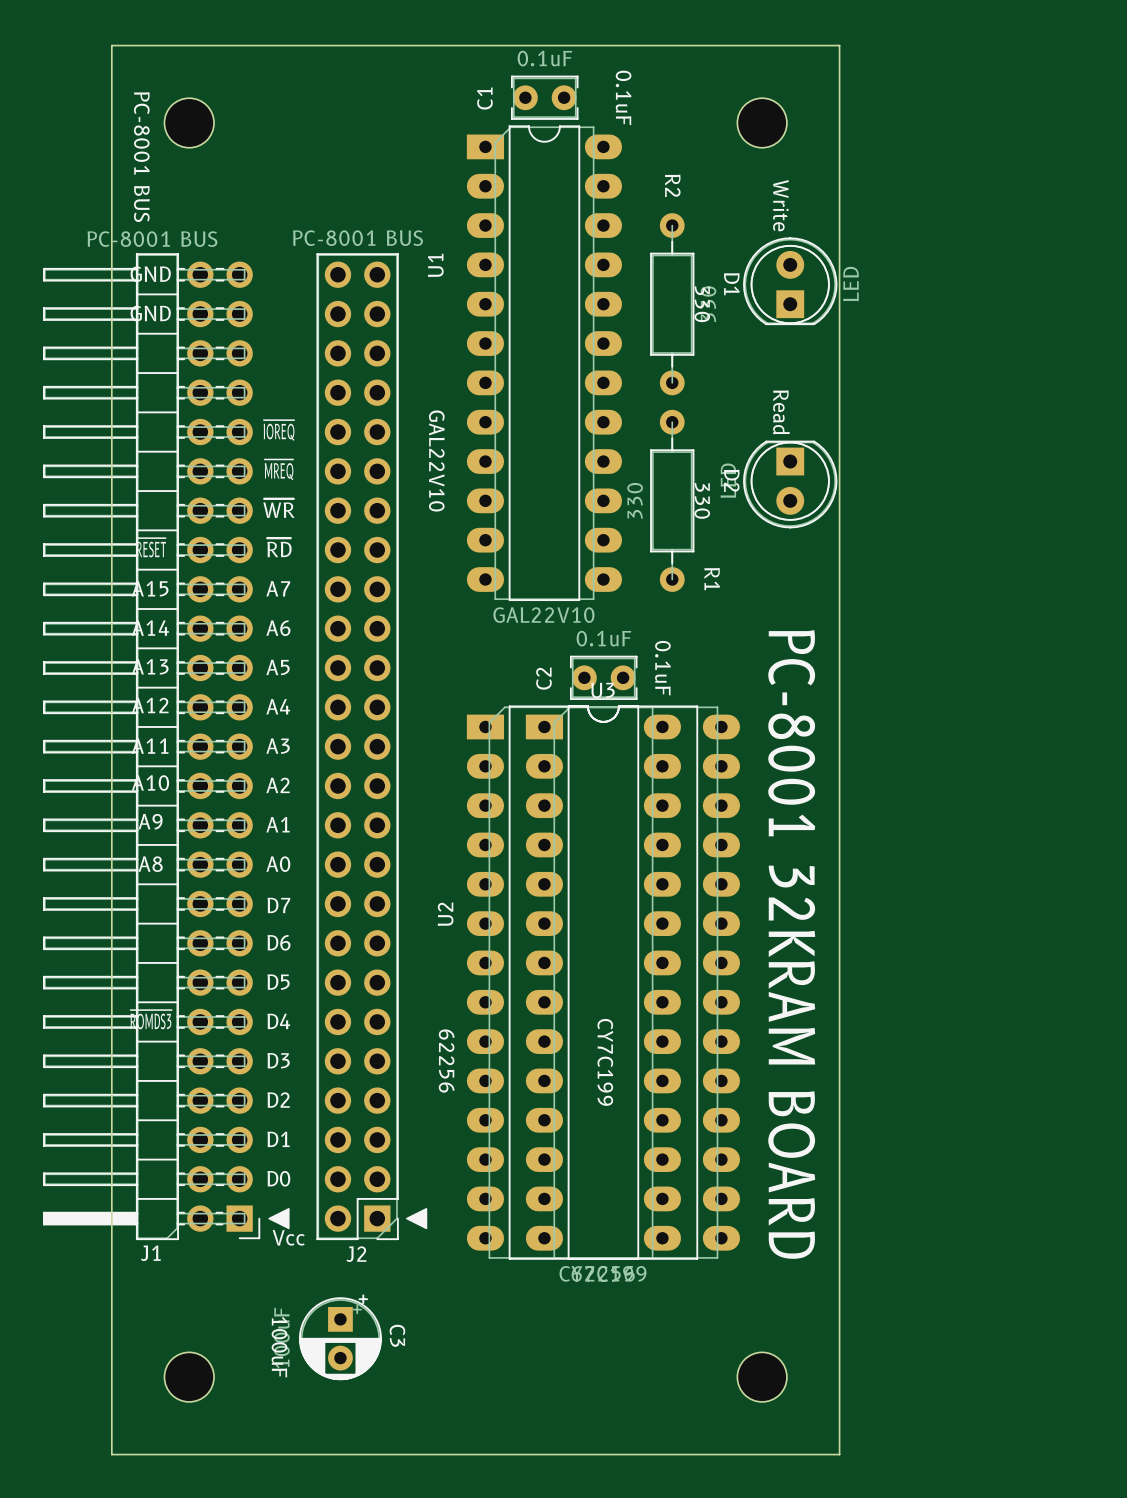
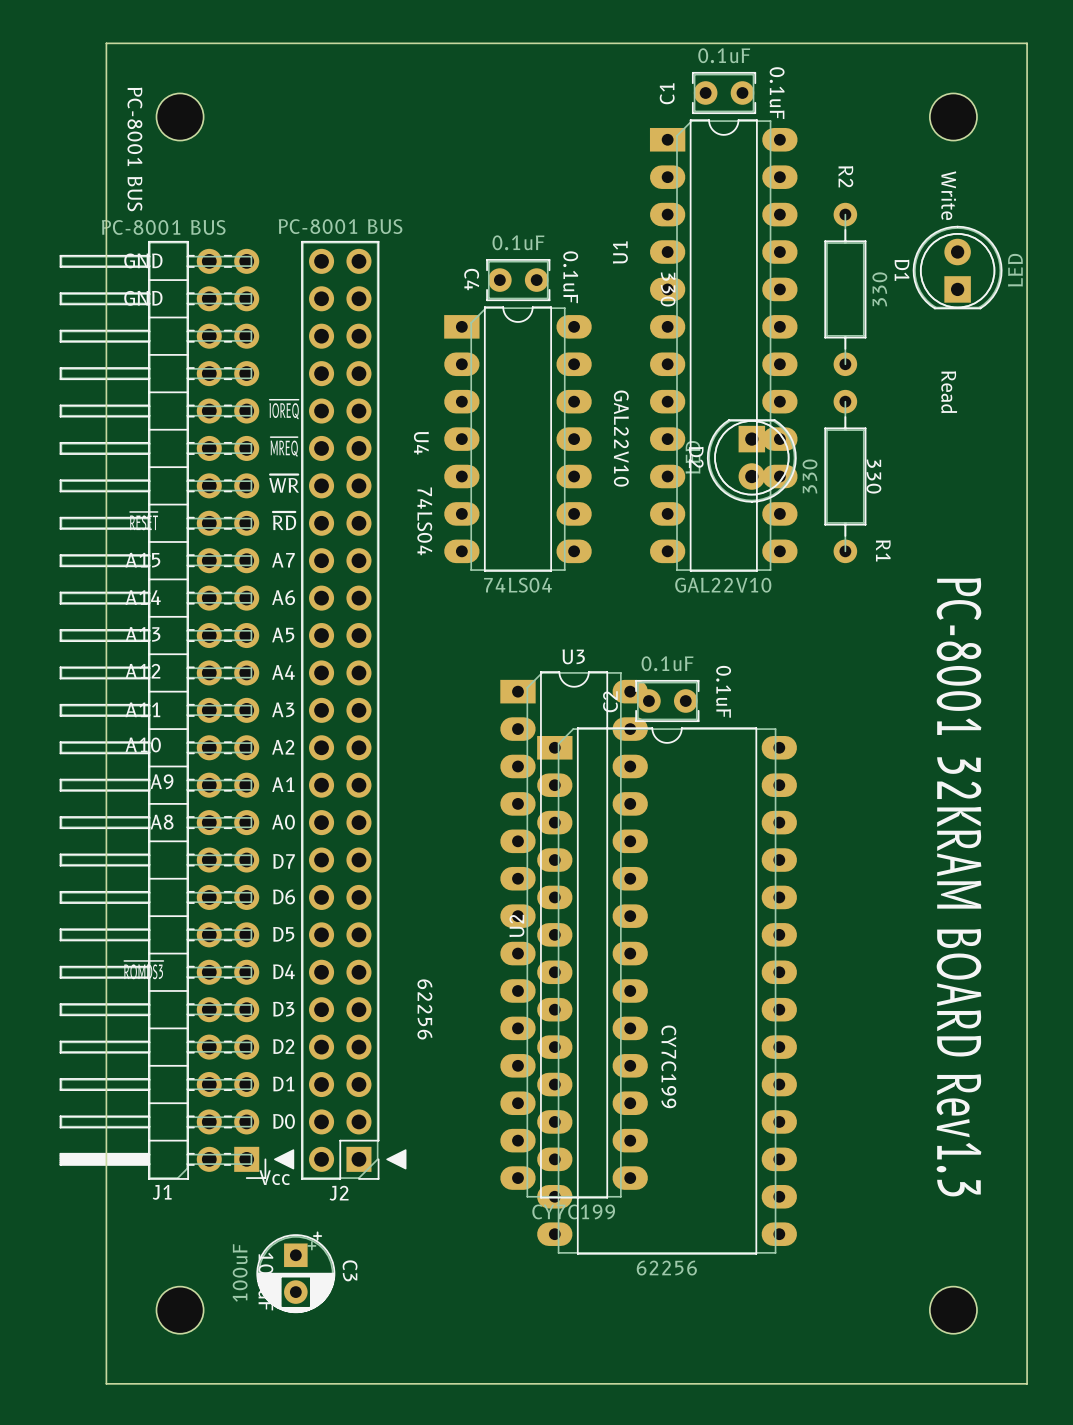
board edge: (839, 45) (839, 1454) -> (798, 43) (1027, 43) (1027, 1383) (798, 1383)
C1 position: (544, 97) -> (724, 92)
text: 0.1uF (623, 97) -> none
text: none -> 0.1uF (777, 93)
part position: (762, 122) -> (953, 117)
text position: Write (780, 205) -> Write (948, 195)
D1 position: (790, 281) -> (957, 267)
text: none -> 0.1uF (570, 277)
C4: none -> 0.1uF (518, 280)
R2 position: (672, 304) -> (845, 289)
U1 position: (544, 363) -> (723, 345)
text position: Read (781, 412) -> Read (949, 392)
text position: ~{IOREQ} (279, 430) -> ~{IOREQ} (284, 409)
text position: GAL22V10 (436, 461) -> GAL22V10 (621, 438)
U4: none -> 74LS04 (517, 439)
text position: ~{MREQ} (279, 469) -> ~{MREQ} (284, 446)
R1 position: (672, 500) -> (845, 476)
text position: 330 (702, 500) -> 330 (873, 476)
text position: ~{WR} (278, 508) -> ~{WR} (284, 483)
text position: ~{RD} (279, 547) -> ~{RD} (284, 521)
text: none -> 74LS04 (424, 521)
text position: A7 (278, 588) -> A7 (283, 560)
text position: A6 (278, 628) -> A6 (283, 597)
text position: A5 (278, 667) -> A5 (283, 634)
text position: 0.1uF (662, 668) -> 0.1uF (723, 691)
C2 position: (603, 677) -> (667, 701)
text position: A4 (278, 706) -> A4 (283, 672)
J1 position: (151, 746) -> (162, 710)
text position: A3 (278, 746) -> A3 (283, 709)
text position: A2 (278, 785) -> A2 (283, 747)
text position: A9 (150, 821) -> A9 (161, 781)
text position: A1 (278, 824) -> A1 (283, 784)
text position: A8 (150, 864) -> A8 (162, 822)
text position: A0 (278, 864) -> A0 (283, 822)
text position: D7 (278, 905) -> D7 (284, 861)
text: none -> PC-8001 32KRAM BOARD Rev1.3 (958, 887)
text position: D6 (278, 942) -> D6 (284, 896)
text: PC-8001 32KRAM BOARD (791, 944) -> none
text position: D5 (278, 982) -> D5 (283, 934)
U2 position: (603, 982) -> (667, 990)
text position: D4 (278, 1021) -> D4 (283, 971)
text position: D3 (278, 1060) -> D3 (283, 1009)
text position: CY7C199 (605, 1062) -> CY7C199 (668, 1066)
text position: D2 (278, 1100) -> D2 (283, 1046)
text position: D1 (278, 1139) -> D1 (283, 1083)
text position: D0 (278, 1178) -> D0 (284, 1121)
drawing position: (278, 1218) -> (284, 1159)
C3 position: (340, 1337) -> (295, 1272)
part position: (762, 1377) -> (953, 1310)

